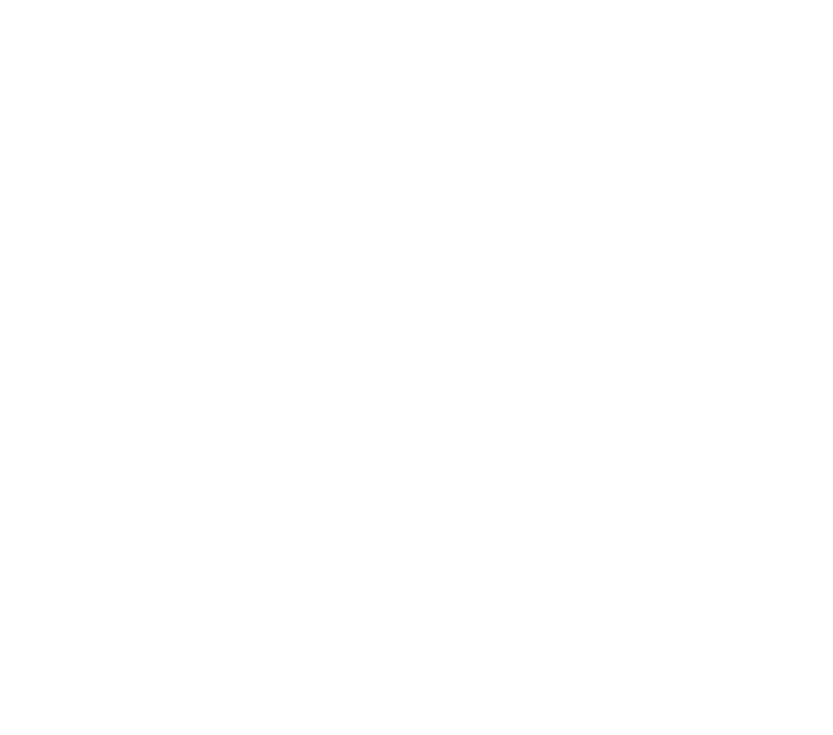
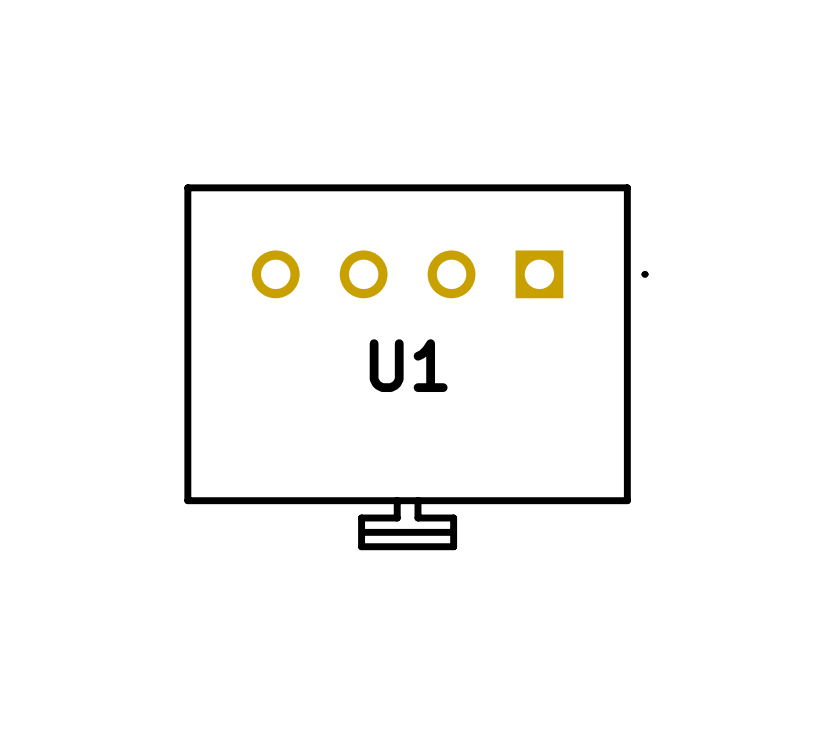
U1: none -> (416, 367)

